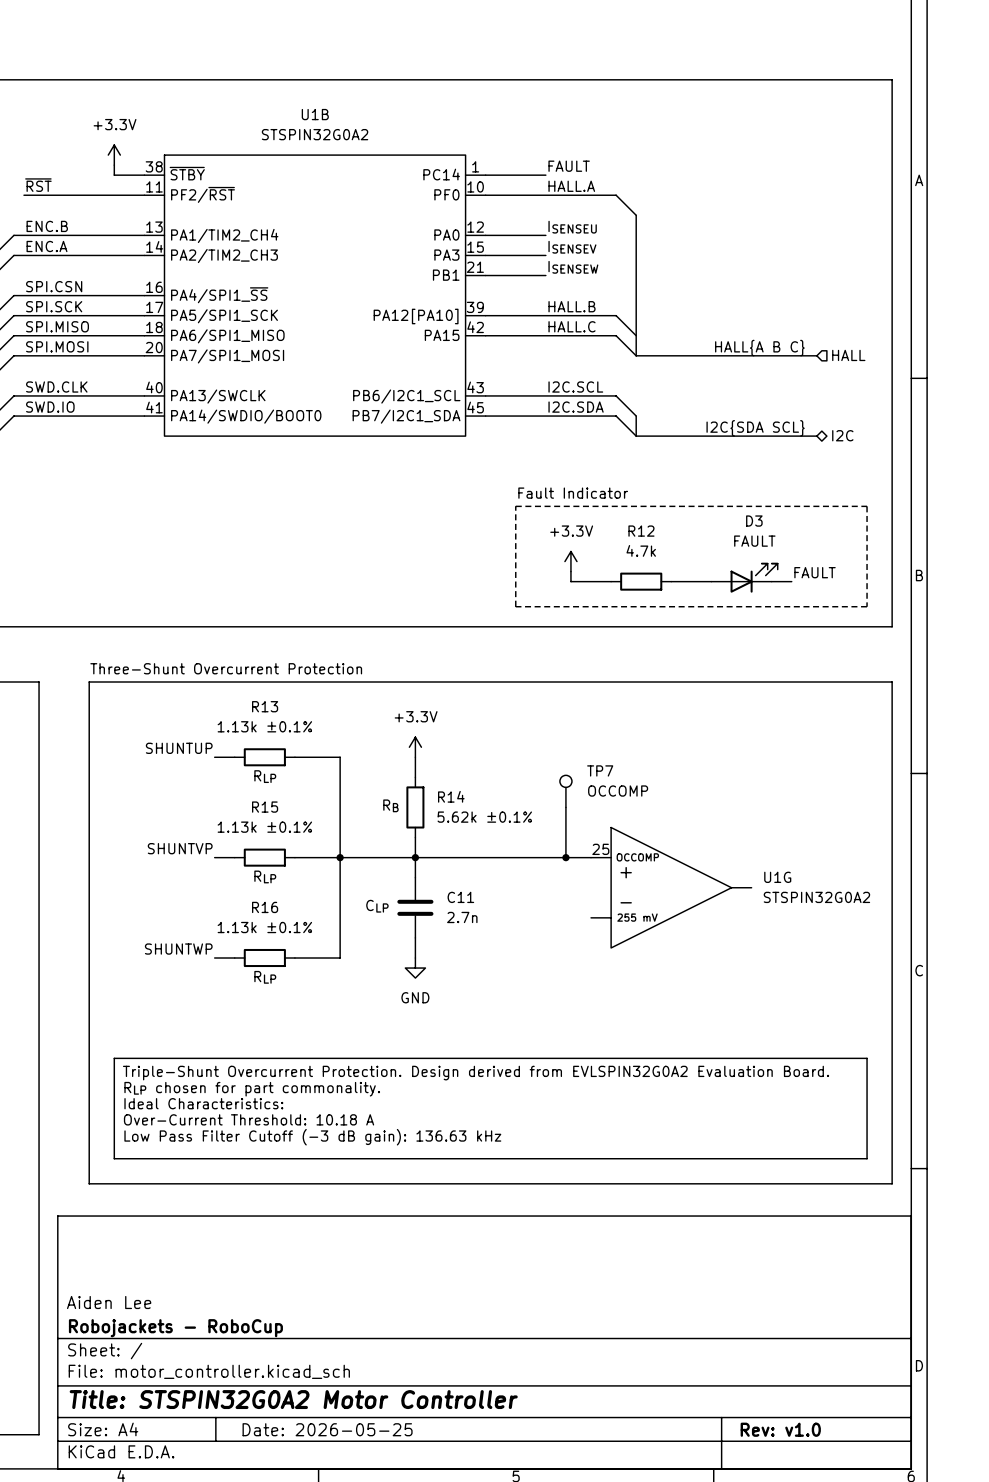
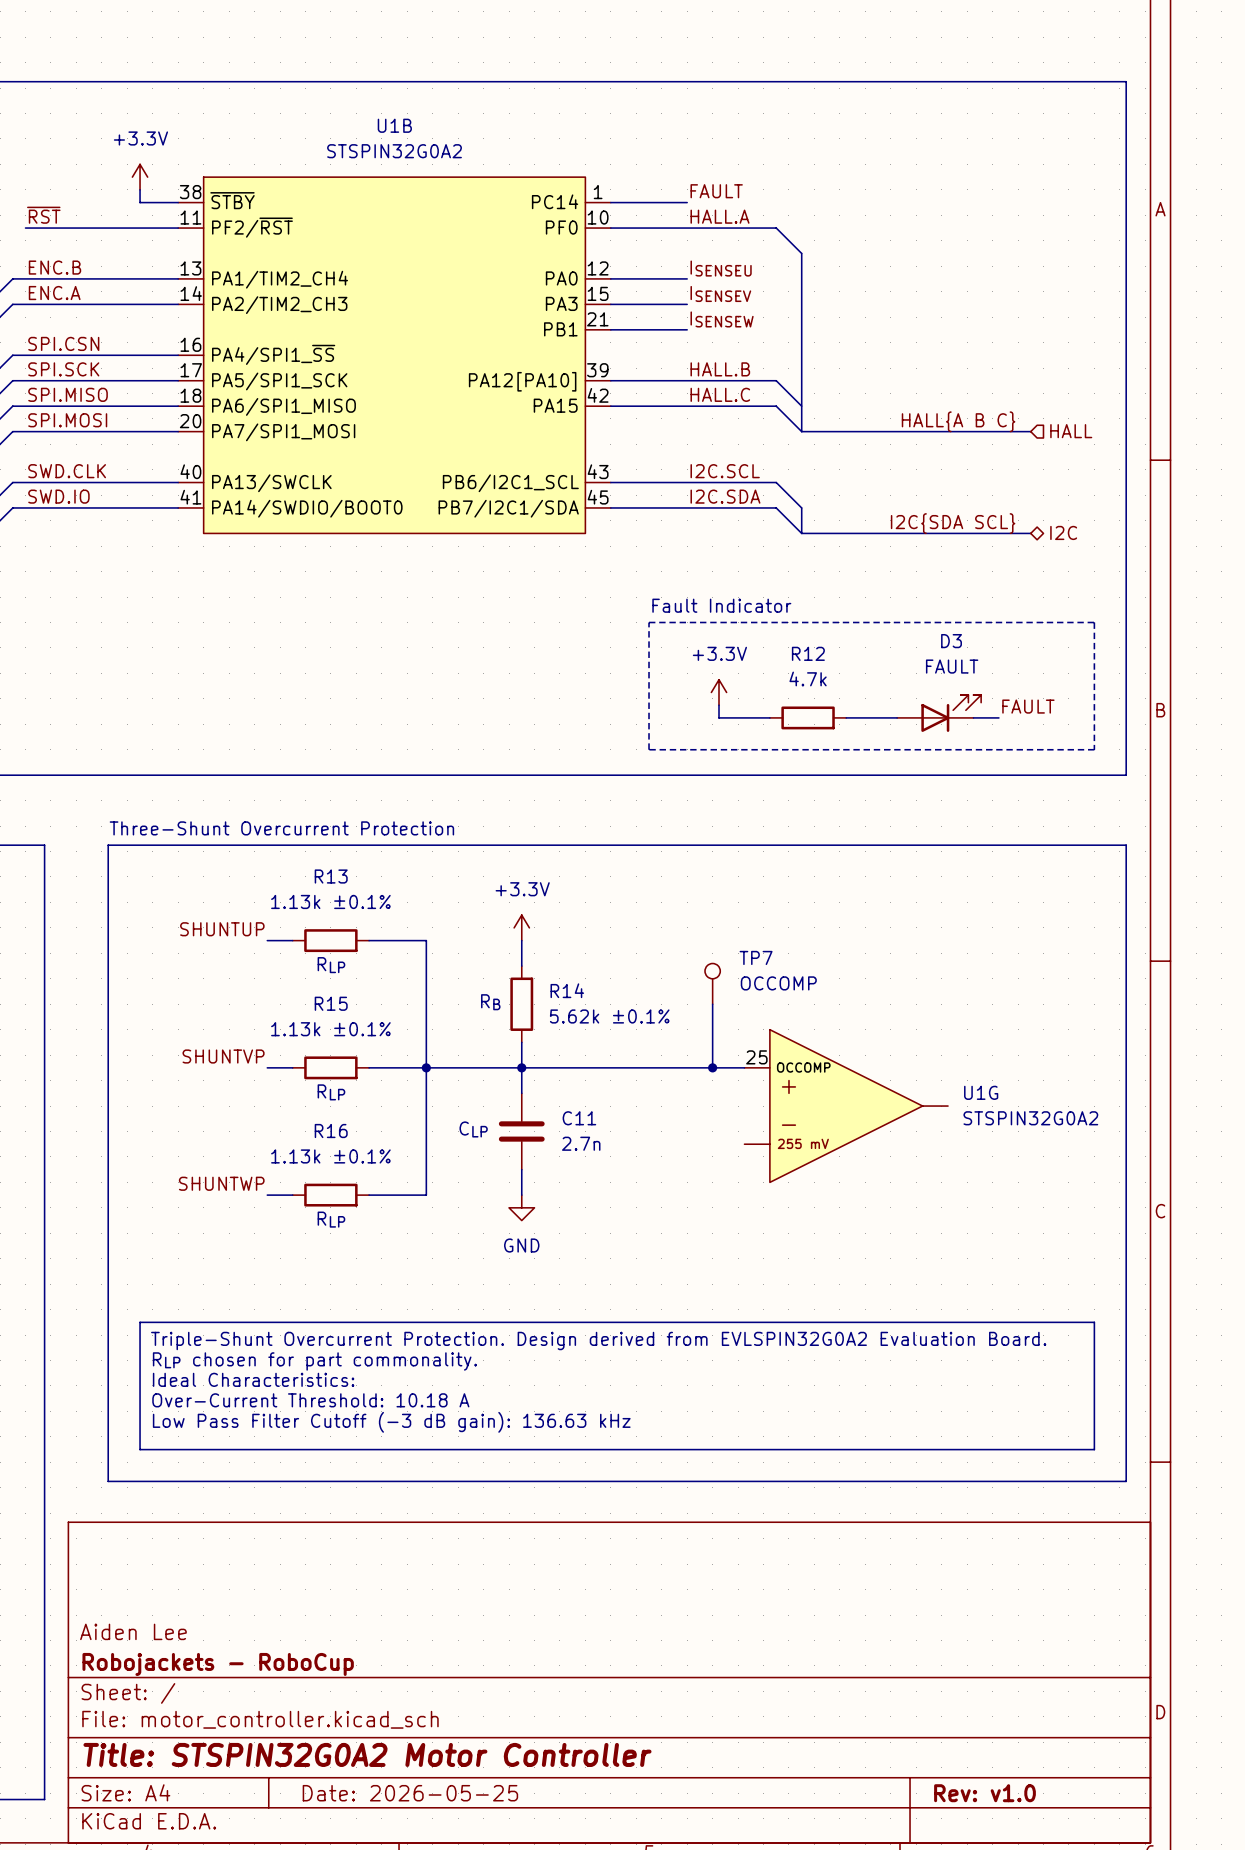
U1B pin name: PB7/I2C1_SDA (406, 416) -> PB7/I2C1/SDA (508, 508)

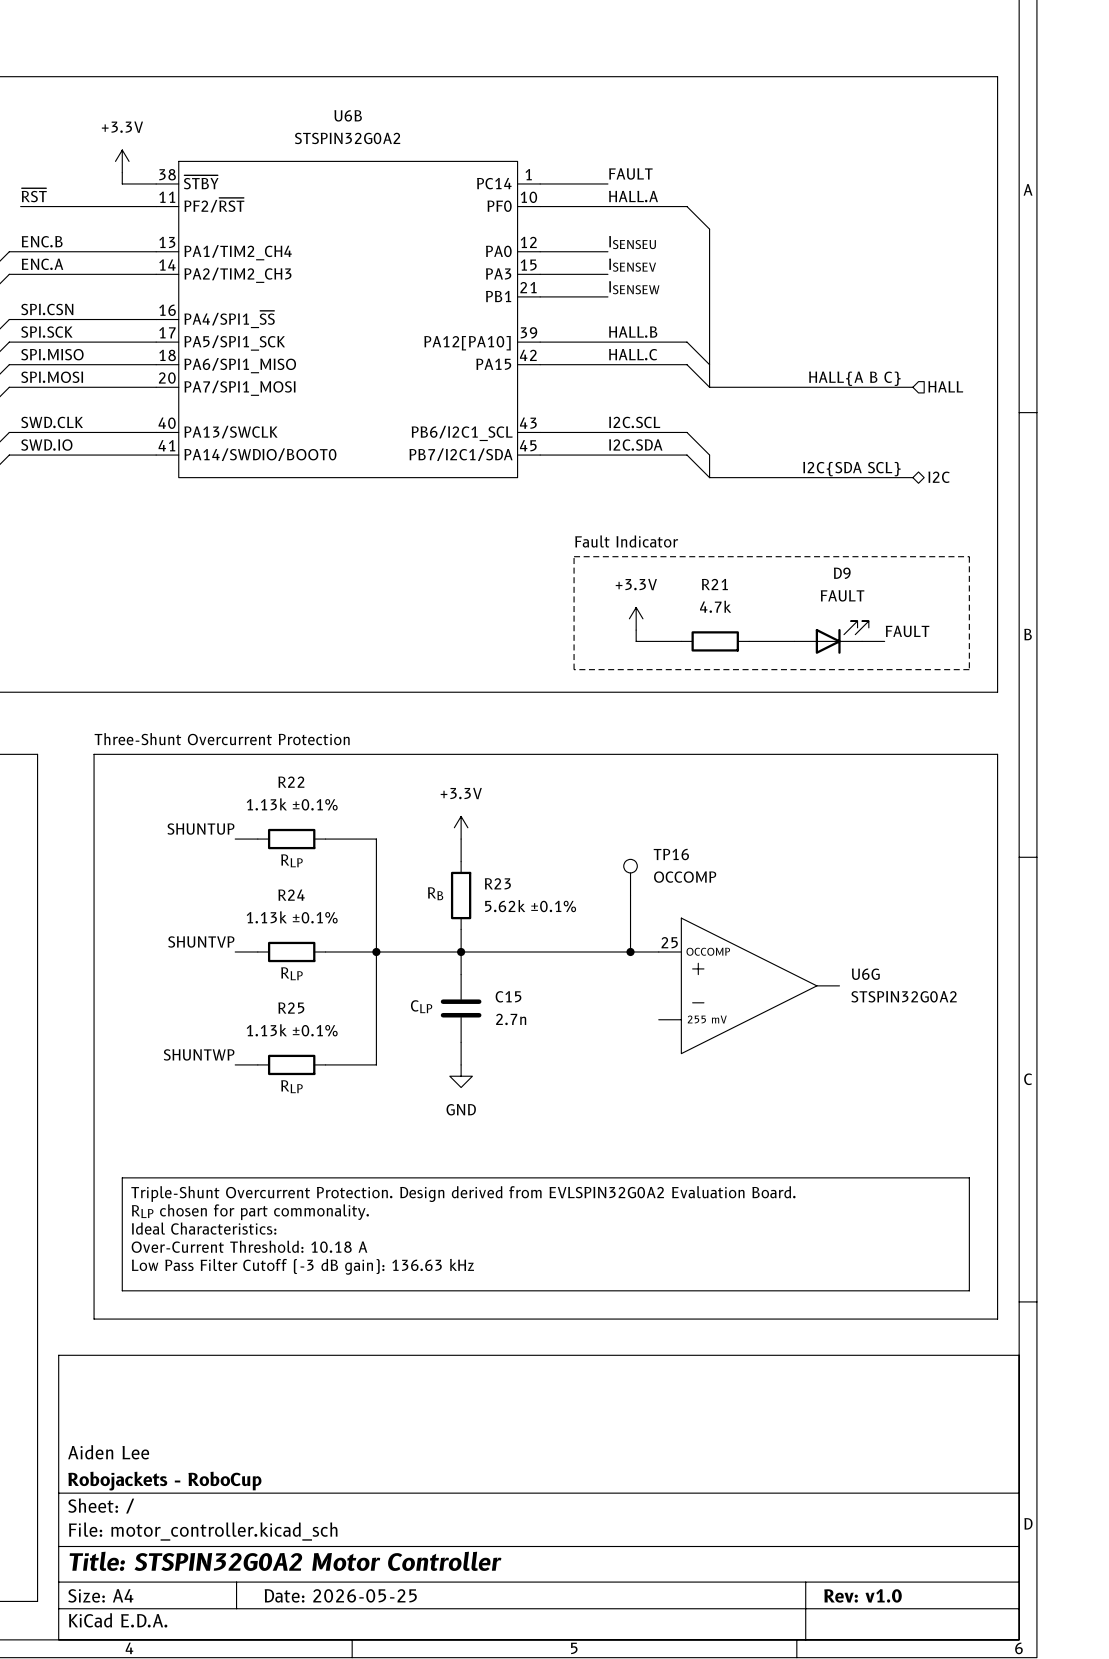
U1B name: U1B (394, 125) -> U6B (348, 115)
D3 name: D3 (951, 641) -> D9 (842, 573)
R12 name: R12 (808, 653) -> R21 (714, 584)
R13 name: R13 (331, 876) -> R22 (291, 782)
TP7 name: TP7 (756, 957) -> TP16 (671, 854)
R14 name: R14 (567, 990) -> R23 (497, 883)
R15 name: R15 (331, 1003) -> R24 (291, 895)
U1G name: U1G (981, 1092) -> U6G (865, 974)
C11 name: C11 (579, 1118) -> C15 (508, 996)
R16 name: R16 (331, 1131) -> R25 (291, 1008)

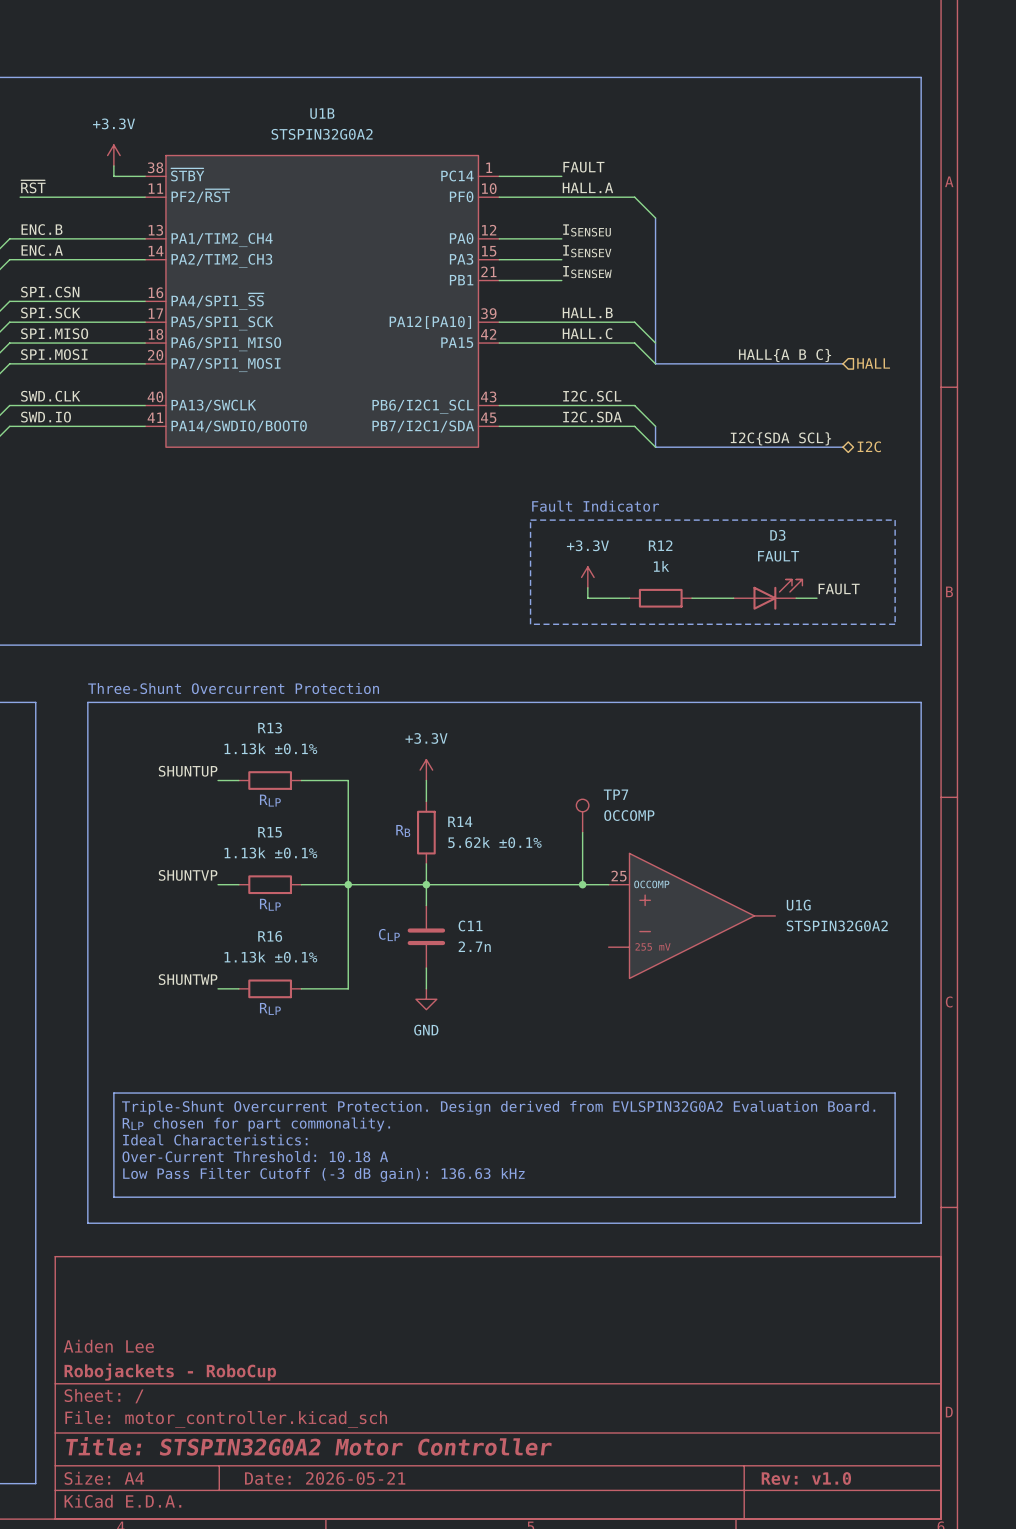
U6B name: U6B (348, 115) -> U1B (322, 113)
D9 name: D9 (842, 573) -> D3 (777, 535)
R21 name: R21 (714, 584) -> R12 (660, 545)
R21 value: 4.7k (715, 606) -> 1k (661, 566)
R22 name: R22 (291, 782) -> R13 (270, 728)
TP16 name: TP16 (671, 854) -> TP7 (615, 794)
R23 name: R23 (497, 883) -> R14 (460, 821)
R24 name: R24 (291, 895) -> R15 (270, 832)
U6G name: U6G (865, 974) -> U1G (798, 905)
C15 name: C15 (508, 996) -> C11 (470, 925)
R25 name: R25 (291, 1008) -> R16 (270, 936)
title block: Date: 2026-05-25 (340, 1595) -> Date: 2026-05-21 (325, 1478)

